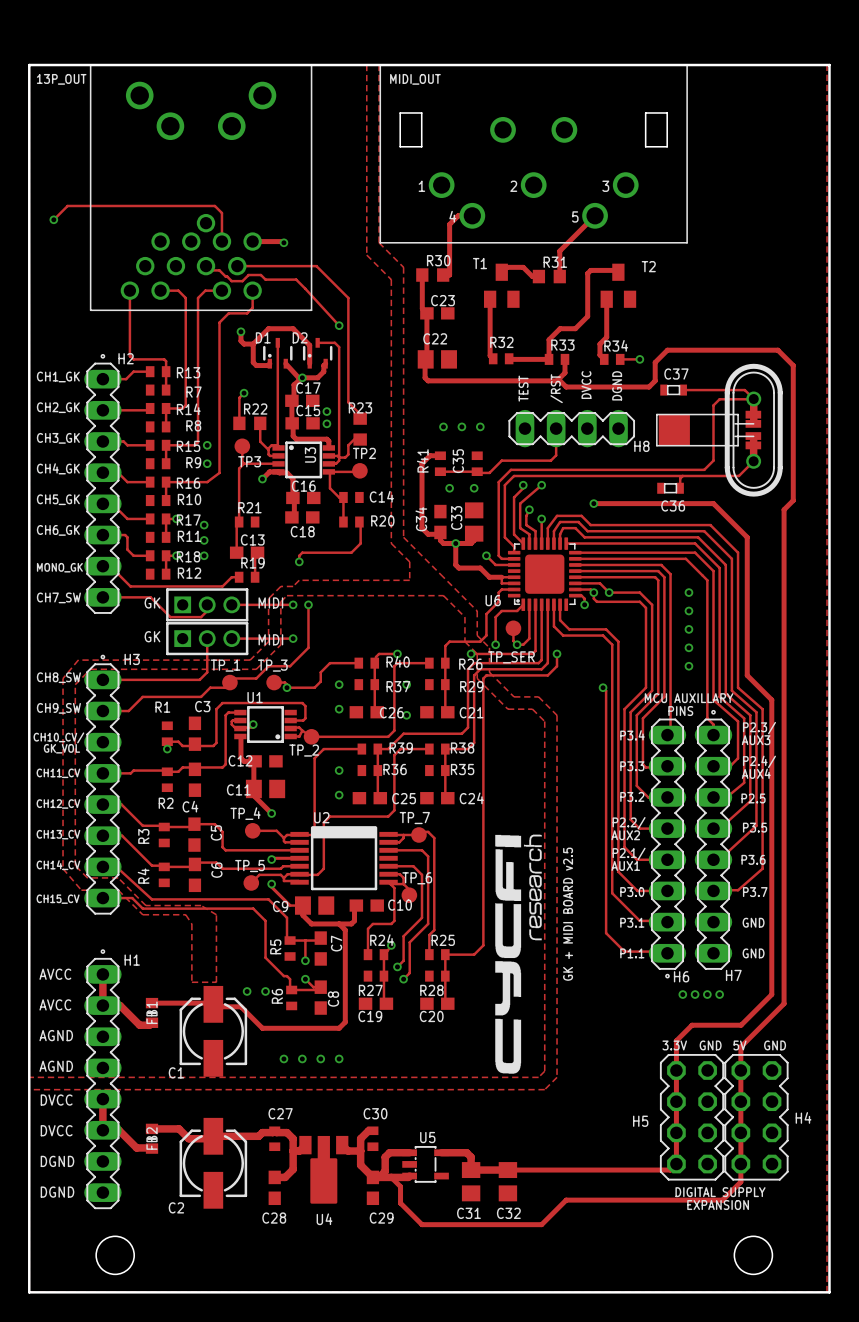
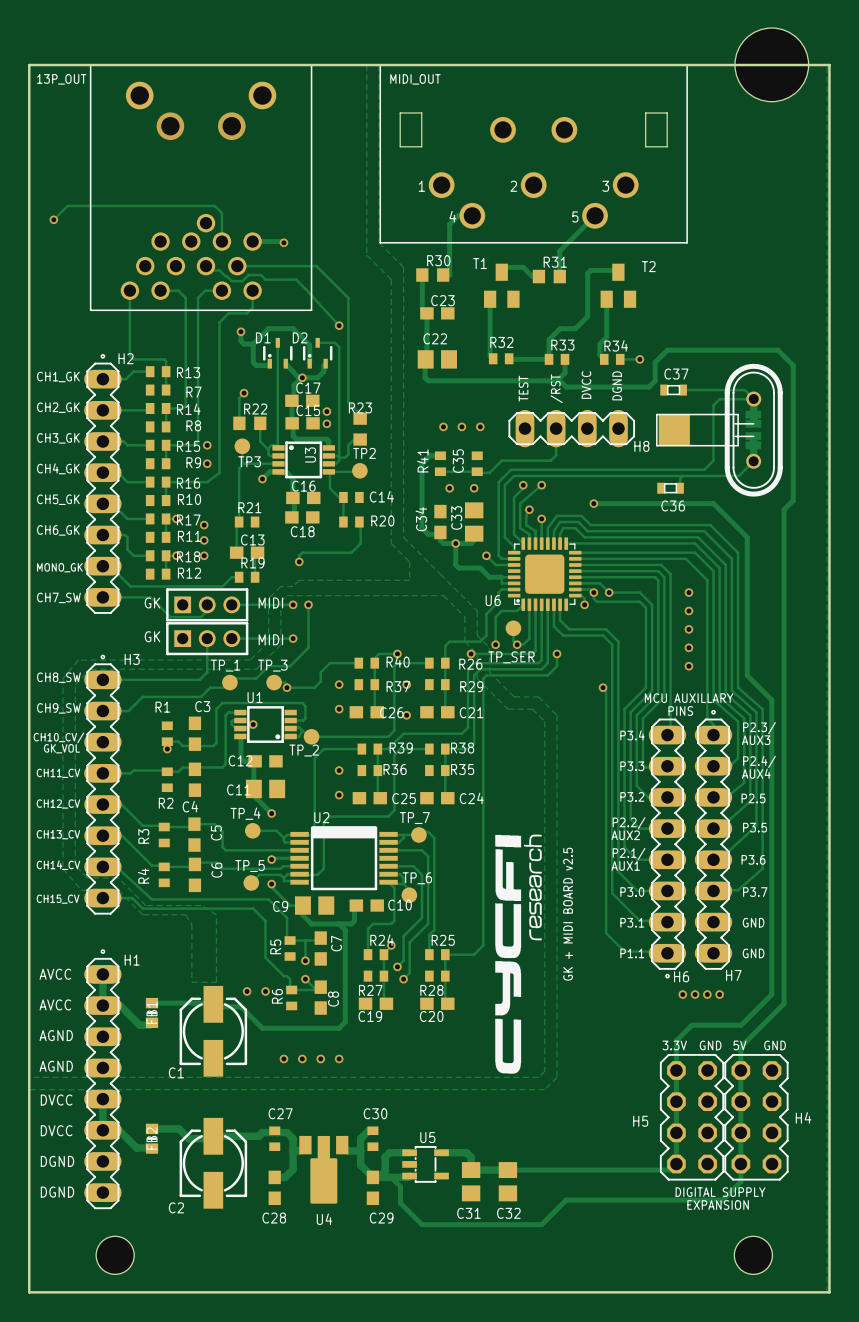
hole: none -> (771, 64)

